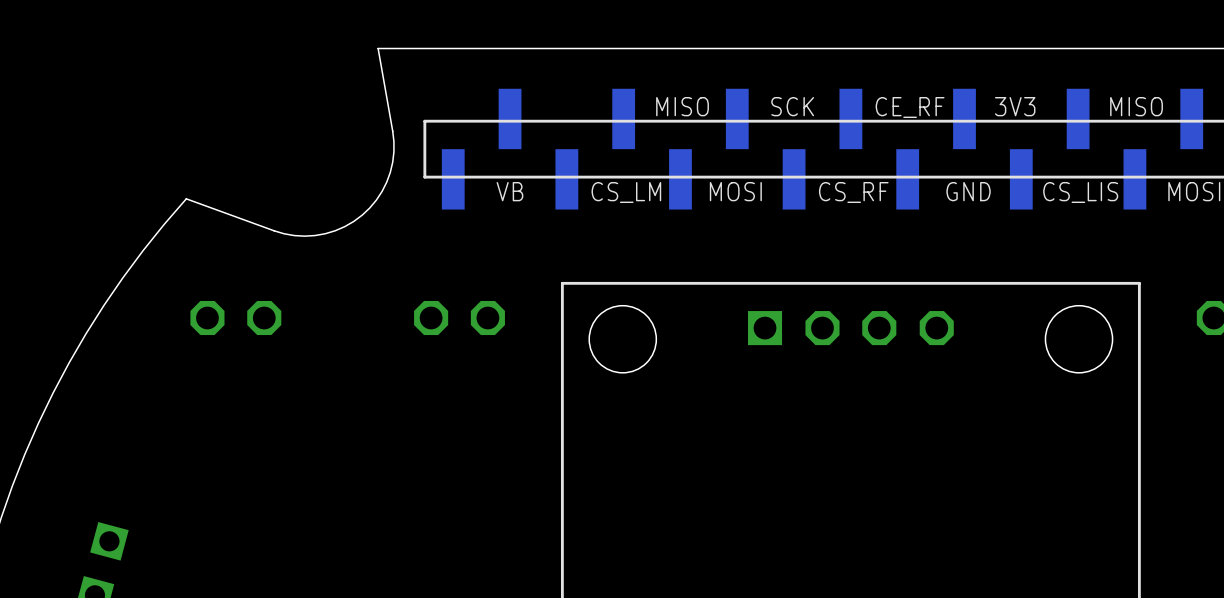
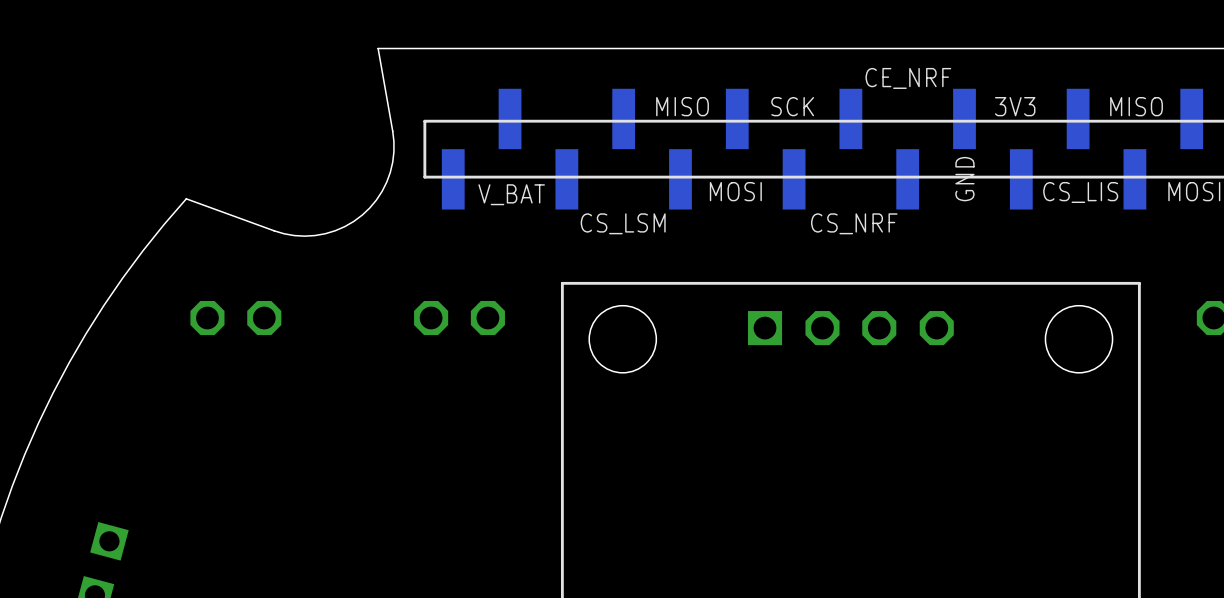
text: CE_RF (910, 107) -> CE_NRF (908, 78)
text: VB (509, 191) -> V_BAT (511, 194)
text rotation: 0° (968, 191) -> 90° counterclockwise (964, 179)
text: CS_LM (626, 192) -> CS_LSM (623, 223)
text: CS_RF (853, 192) -> CS_NRF (854, 223)

